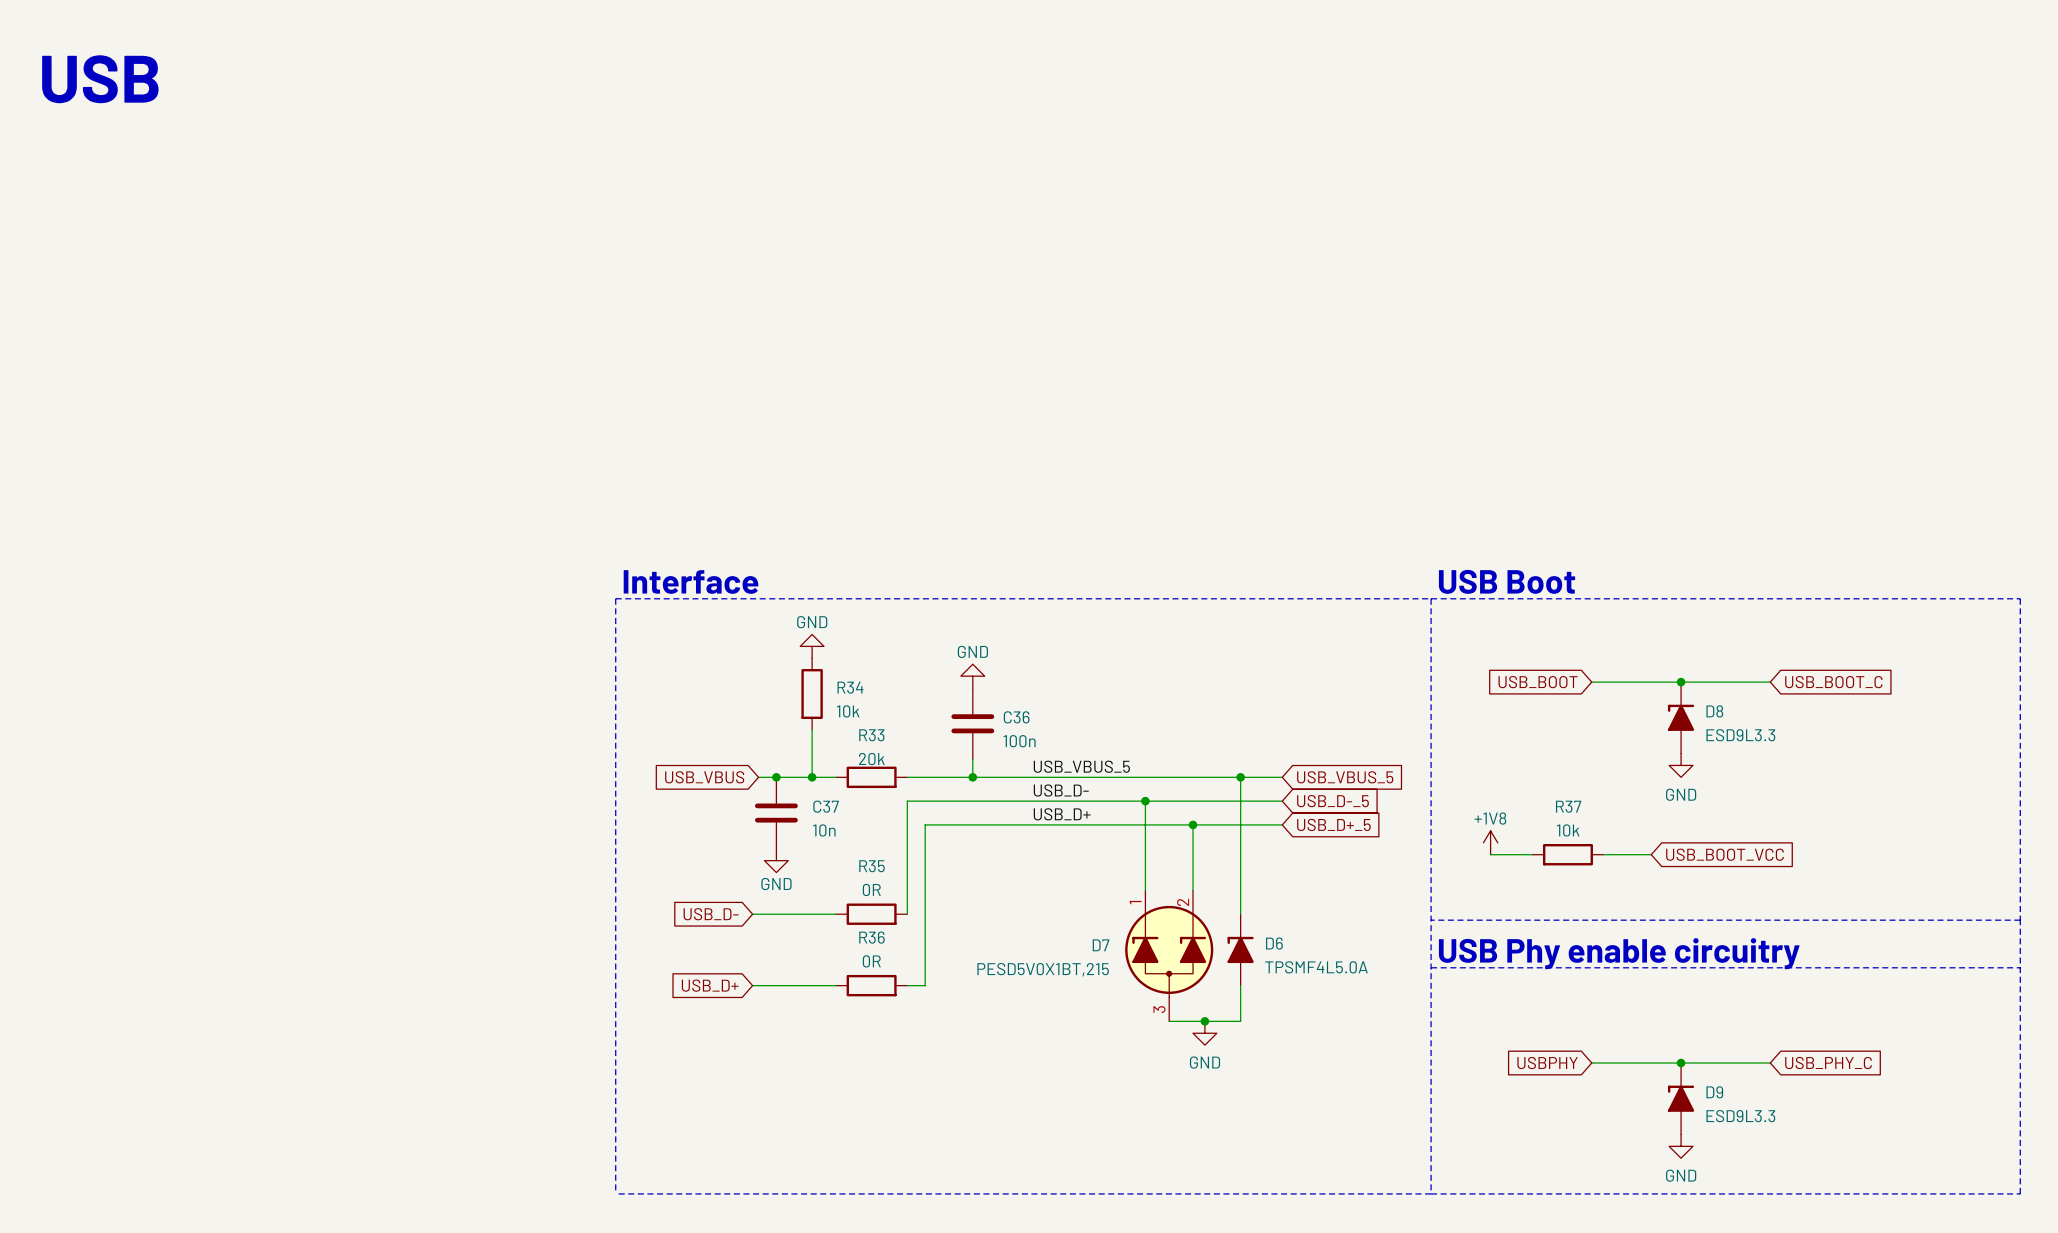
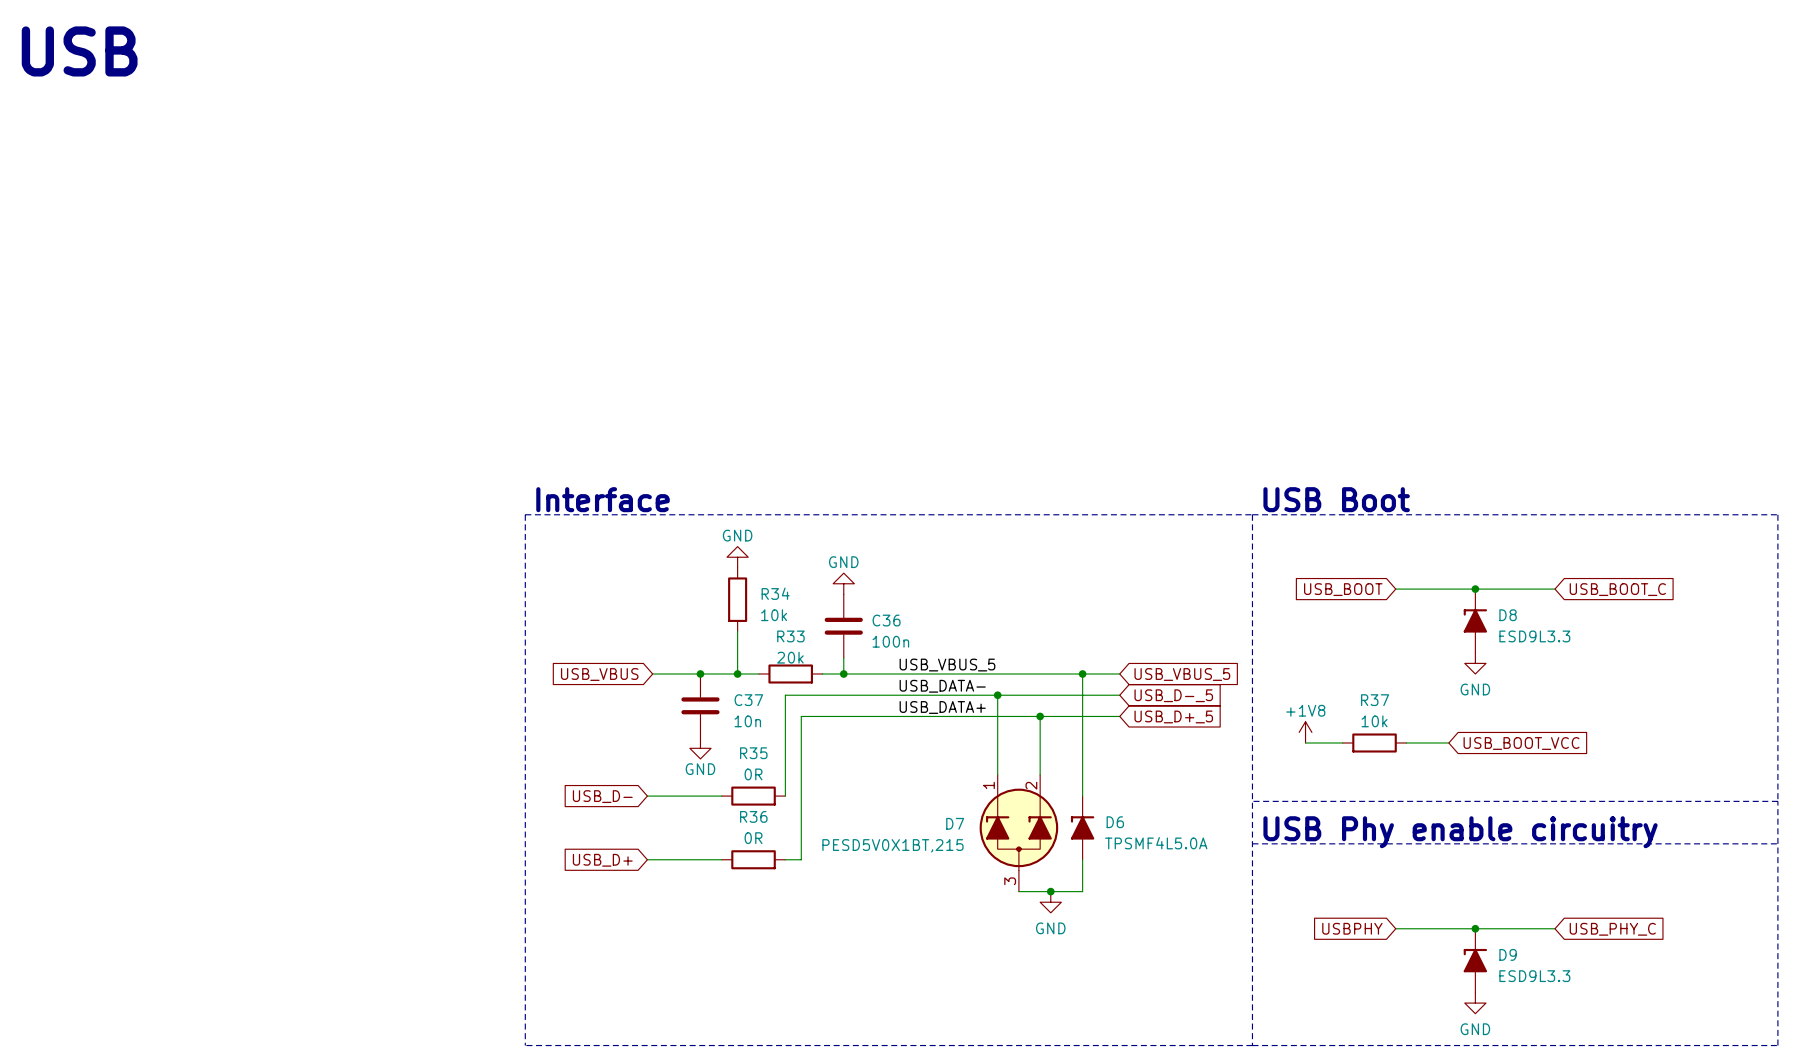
power symbol position: GND (812, 646) -> GND (737, 557)
R34 position: (812, 694) -> (737, 599)
wire: (812, 729) (812, 777) -> (737, 631) (737, 674)
junction: (776, 777) -> none
junction: none -> (737, 674)
R33 position: (871, 777) -> (790, 674)
wire: (907, 777) (948, 777) -> (721, 674) (758, 674)
label: USB_D- (1061, 790) -> USB_DATA- (942, 686)
C37 position: (776, 813) -> (700, 705)
label: USB_D+ (1062, 814) -> USB_DATA+ (942, 707)
power symbol position: GND (776, 860) -> GND (700, 748)

